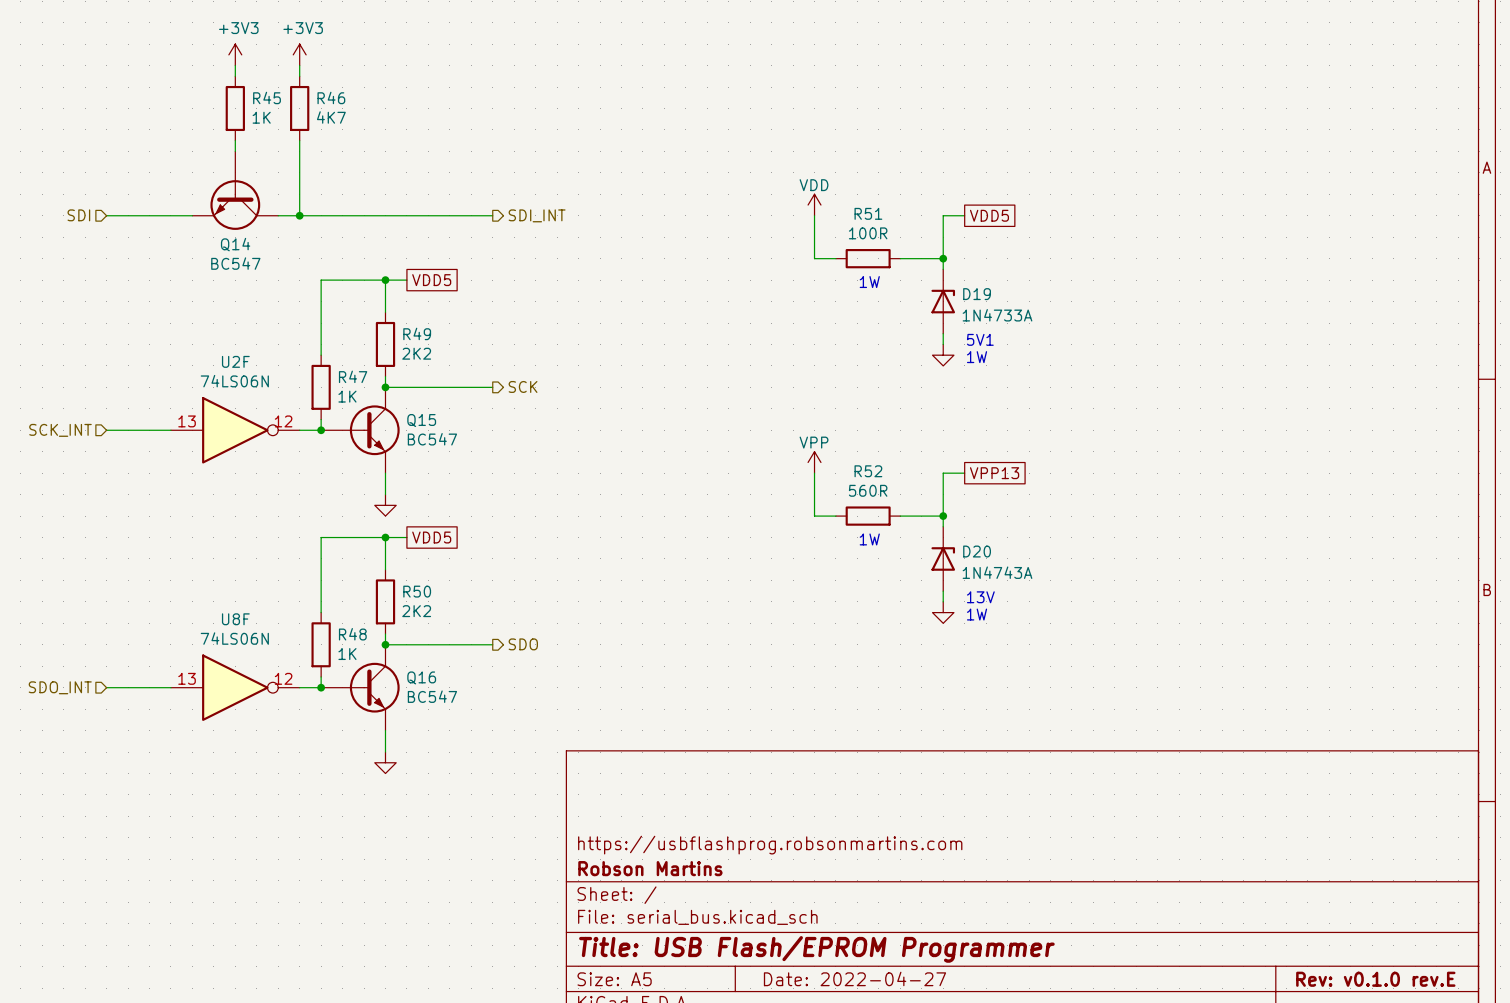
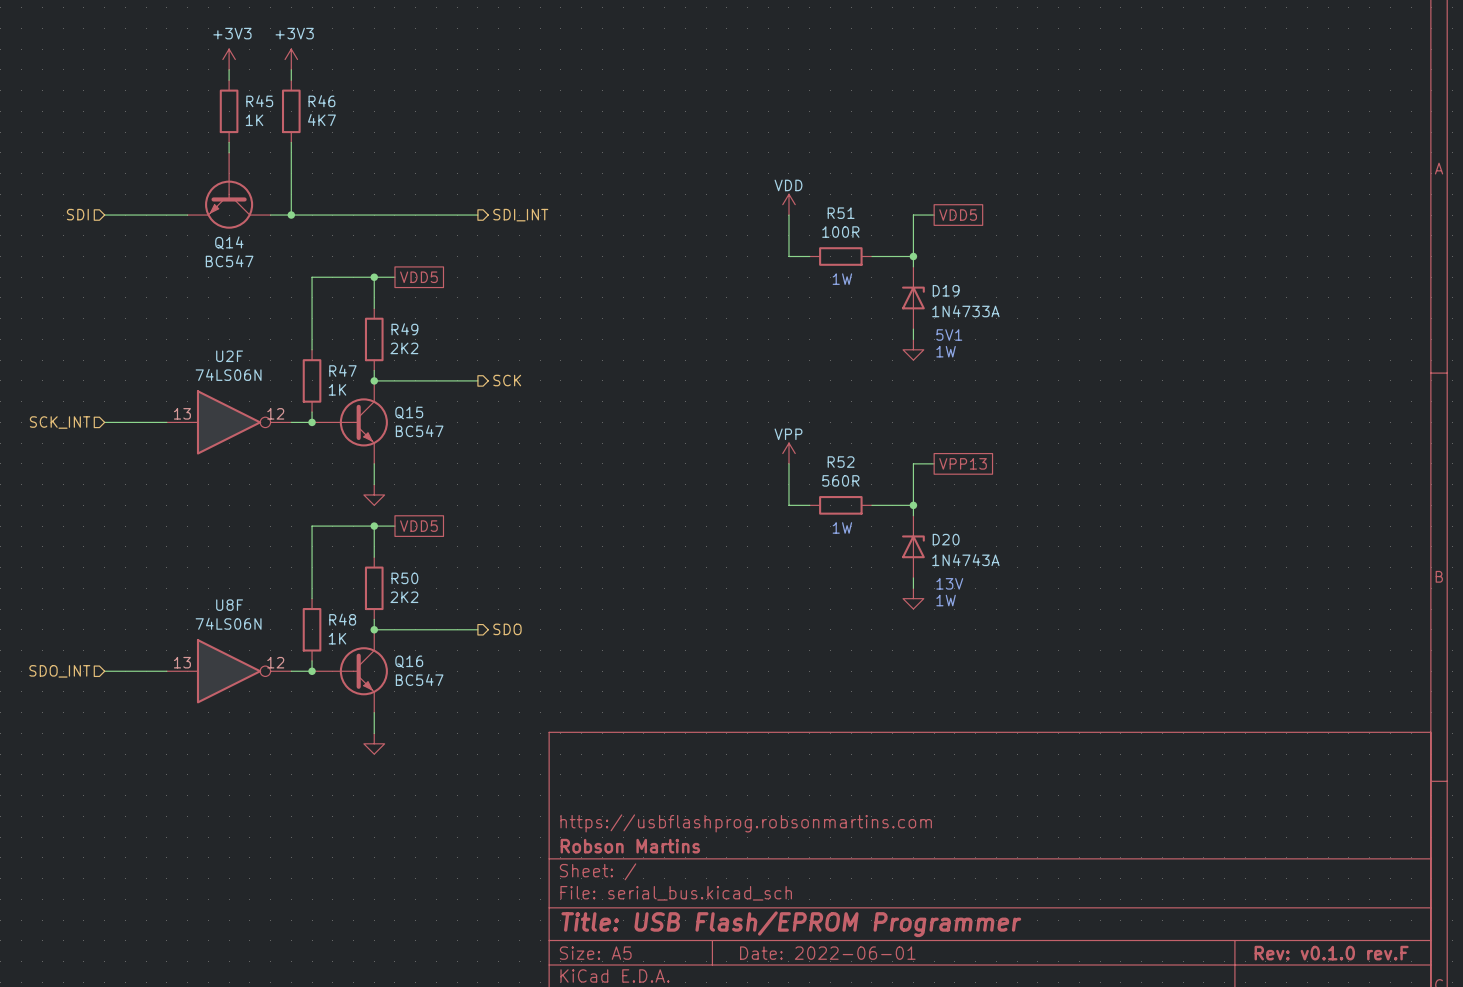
title block: Date: 2022-04-27 (854, 978) -> Date: 2022-06-01 (827, 953)
title block: Rev: v0.1.0 rev.E (1375, 979) -> Rev: v0.1.0 rev.F (1331, 953)

